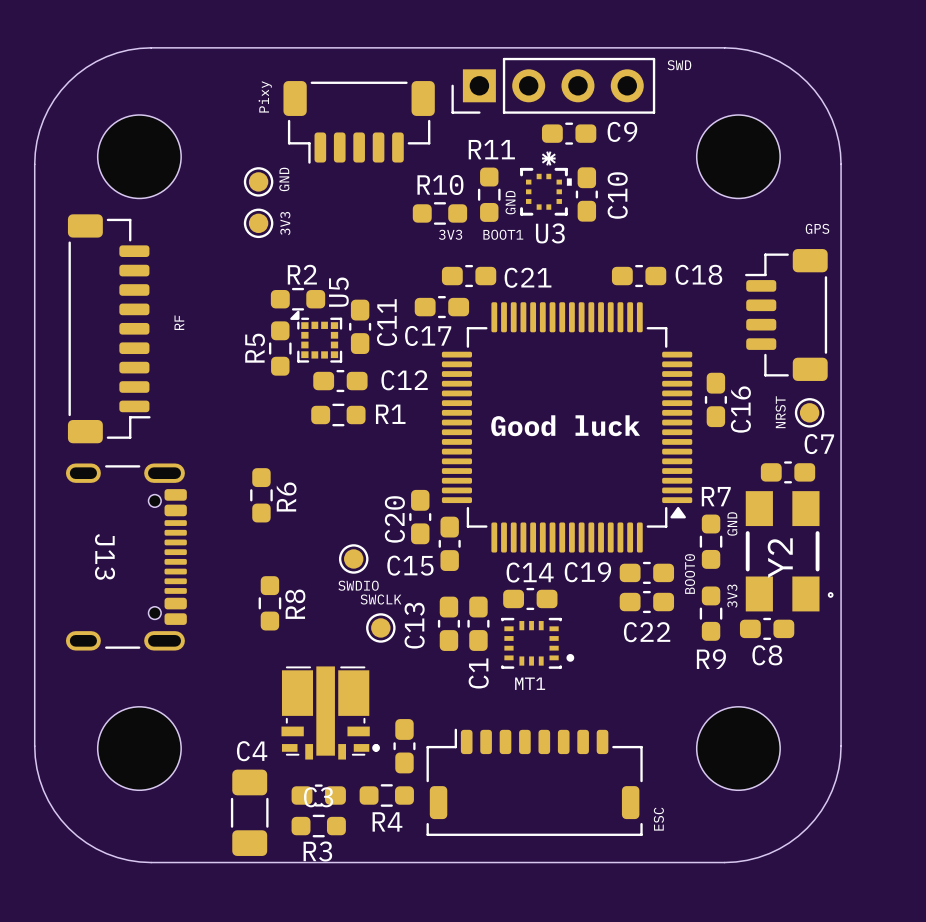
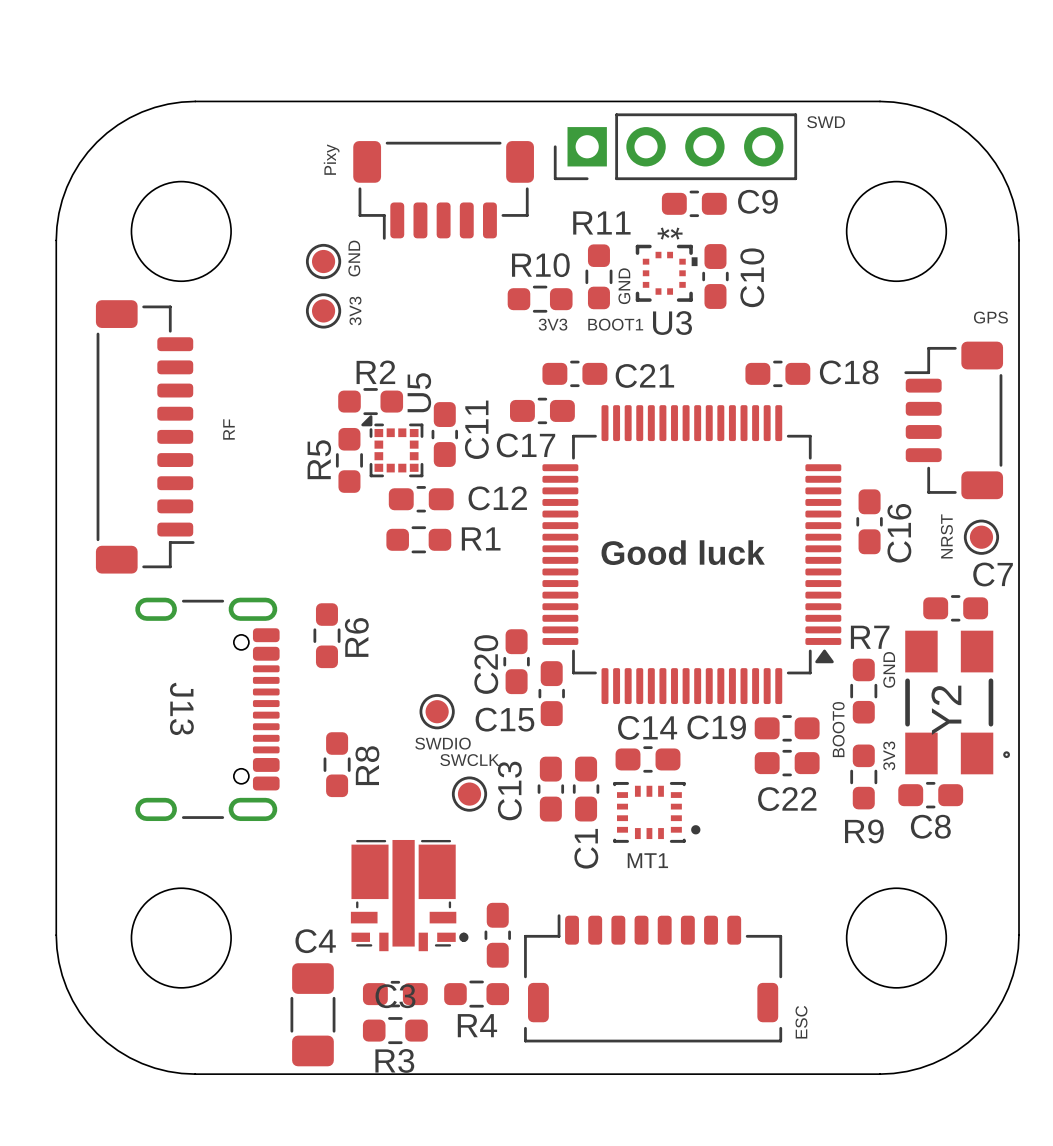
J13 position: (126, 557) -> (207, 709)

